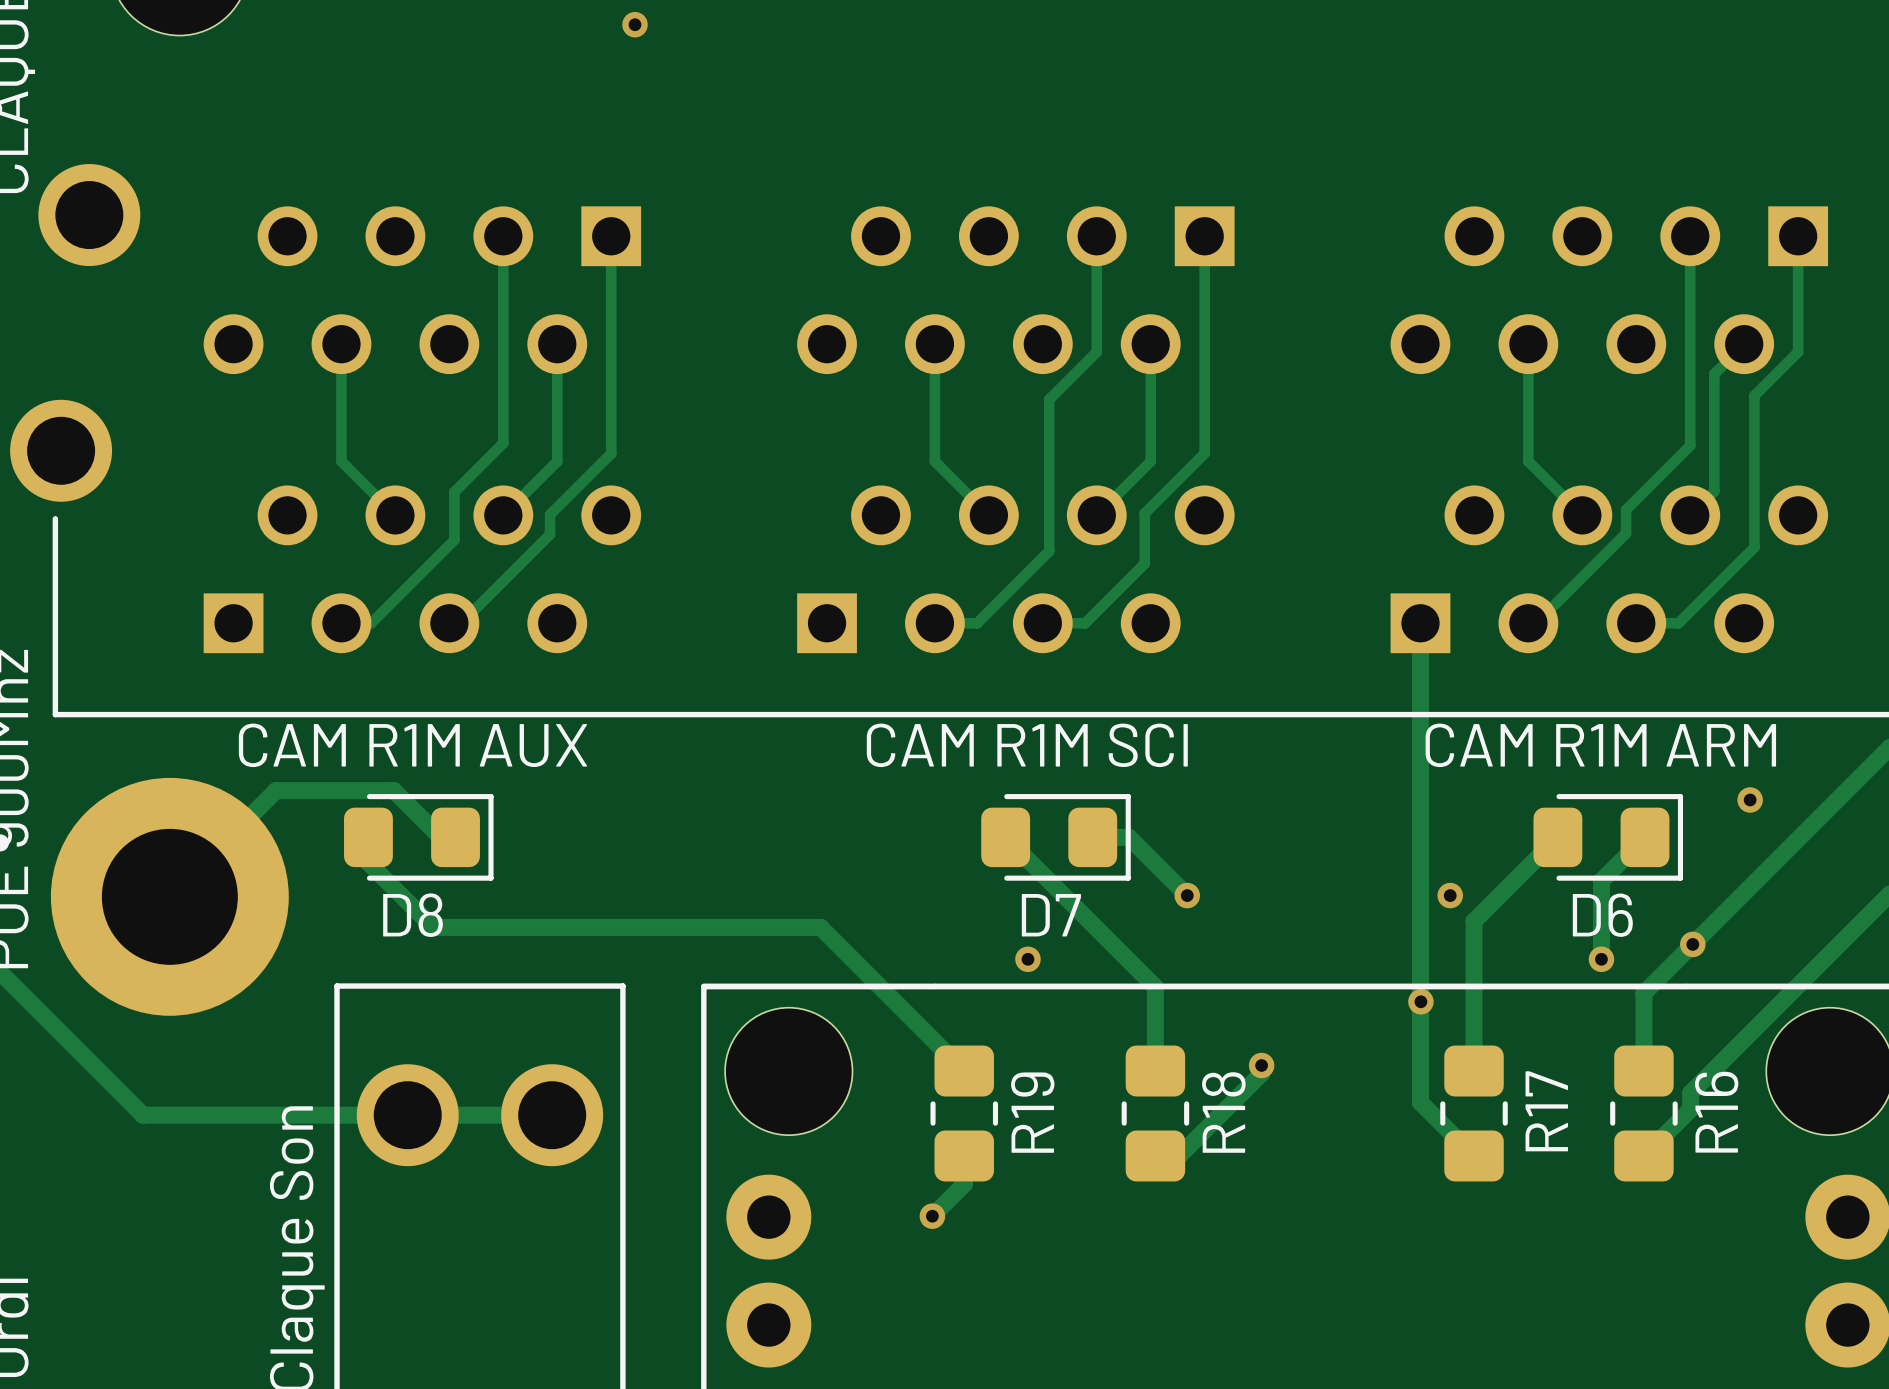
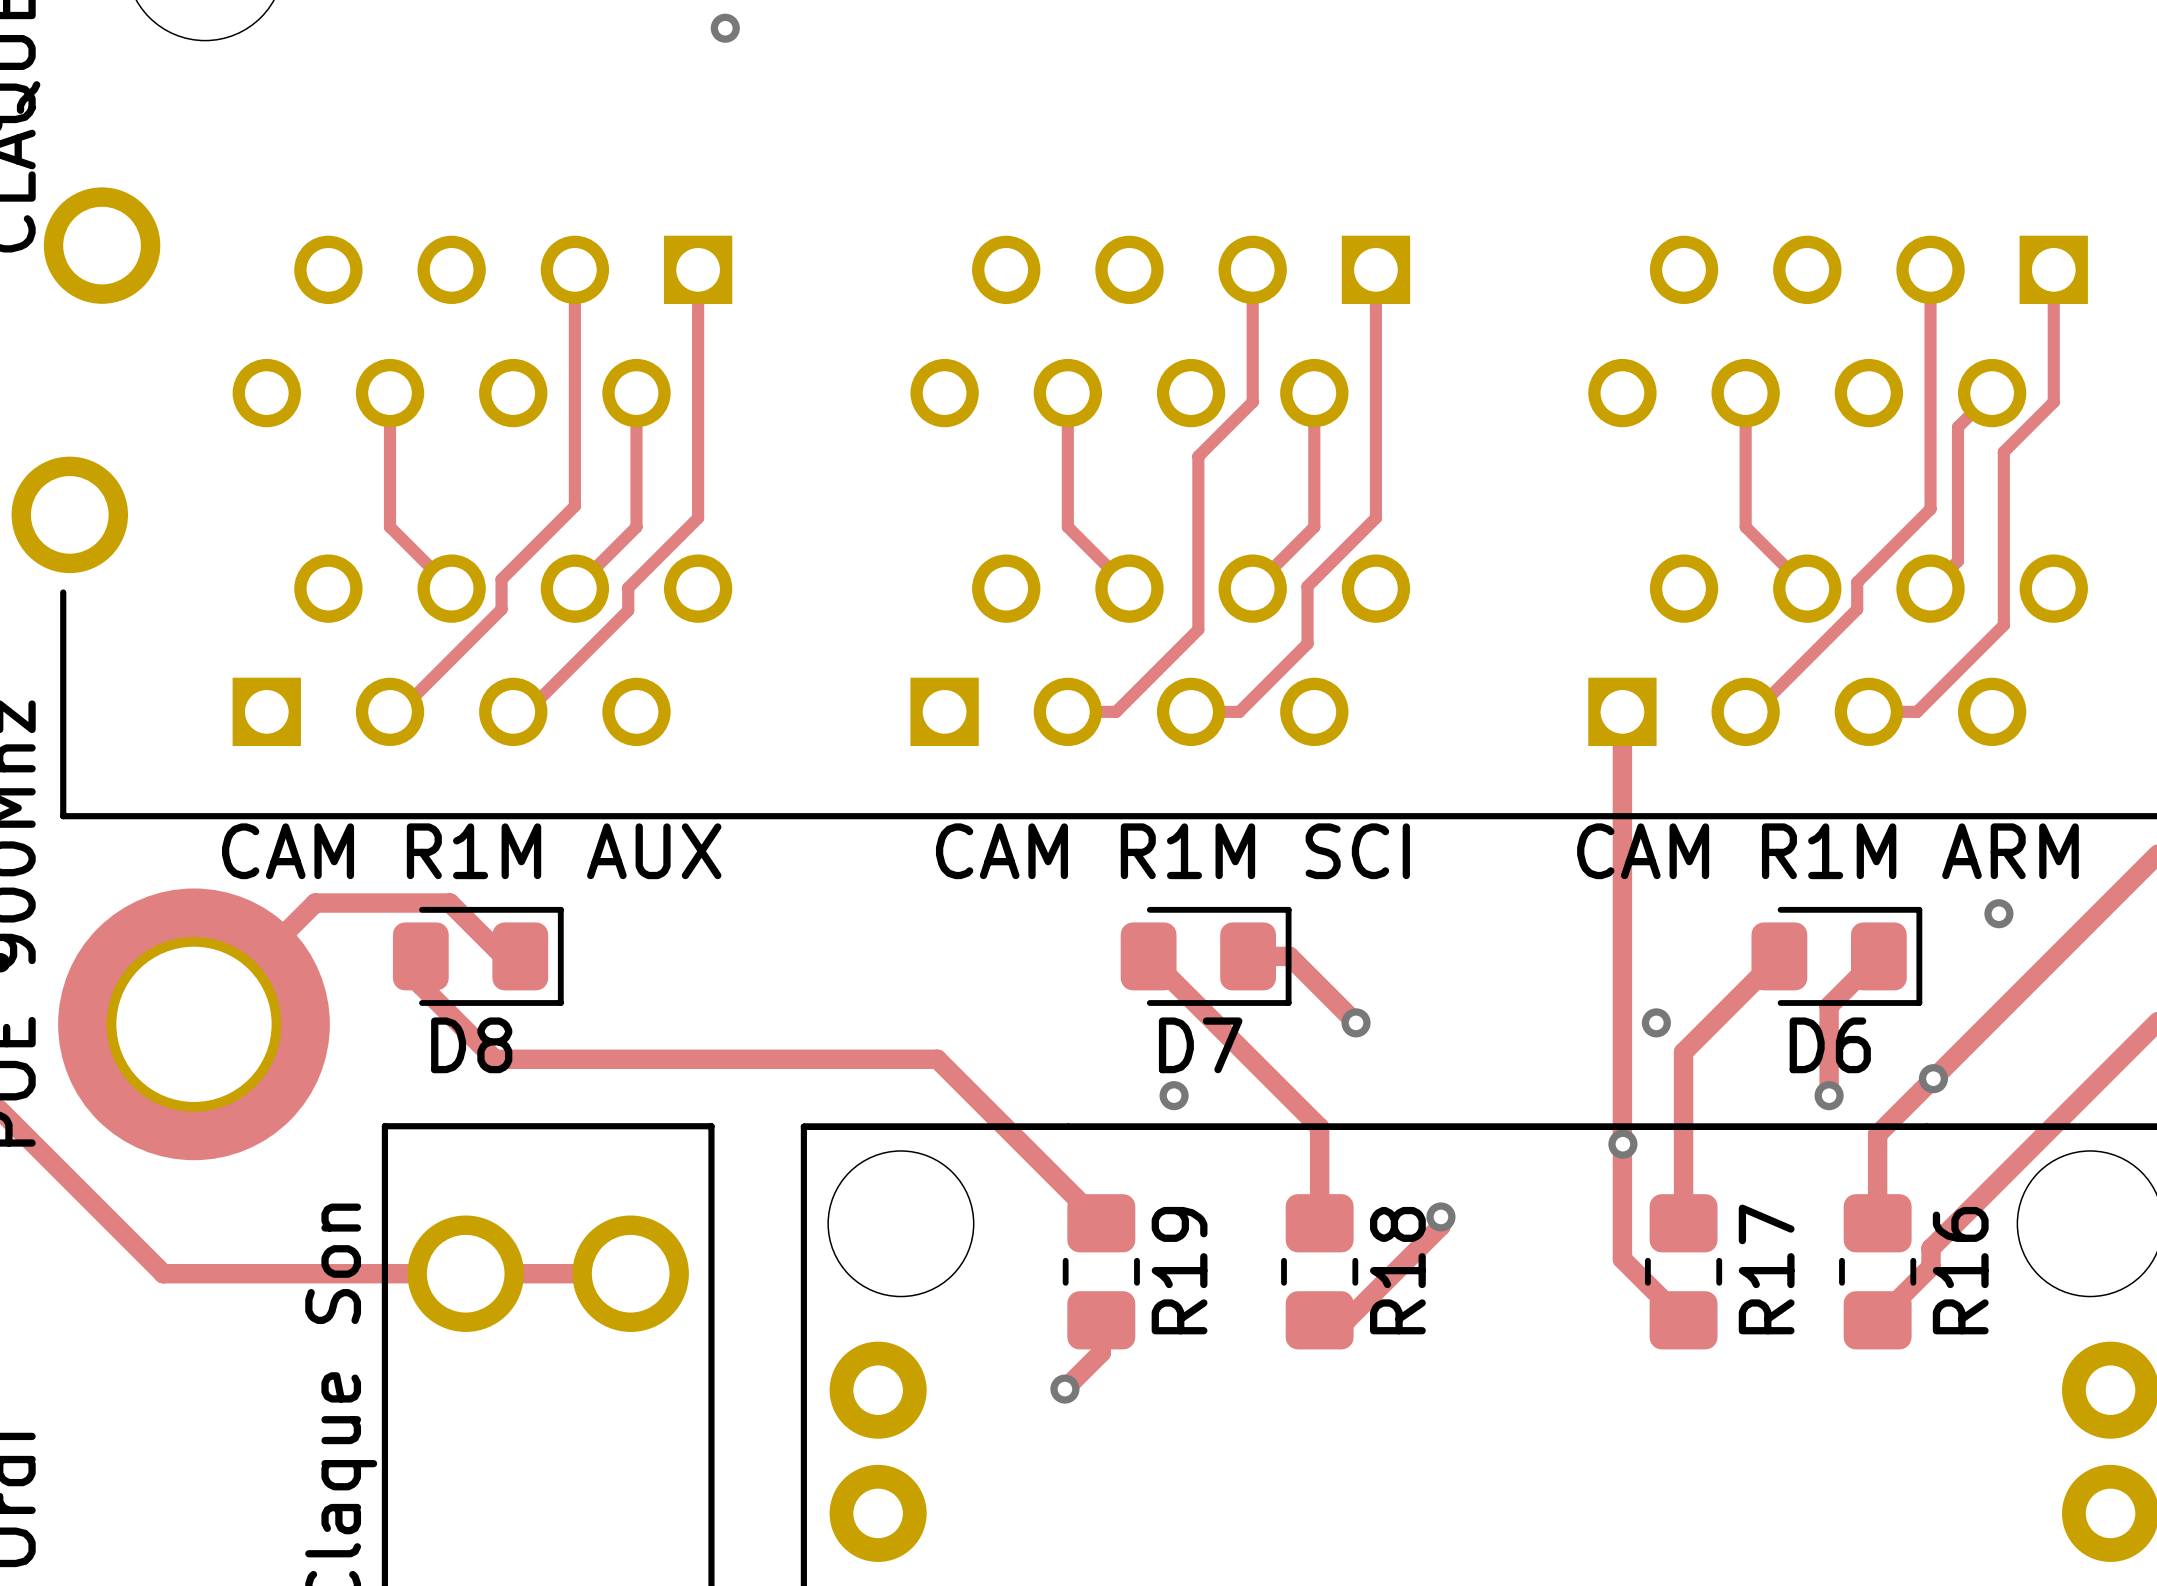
track: (454, 492) (454, 540) (371, 623) (349, 623) -> (519, 561) (501, 579) (501, 609) (399, 711)

